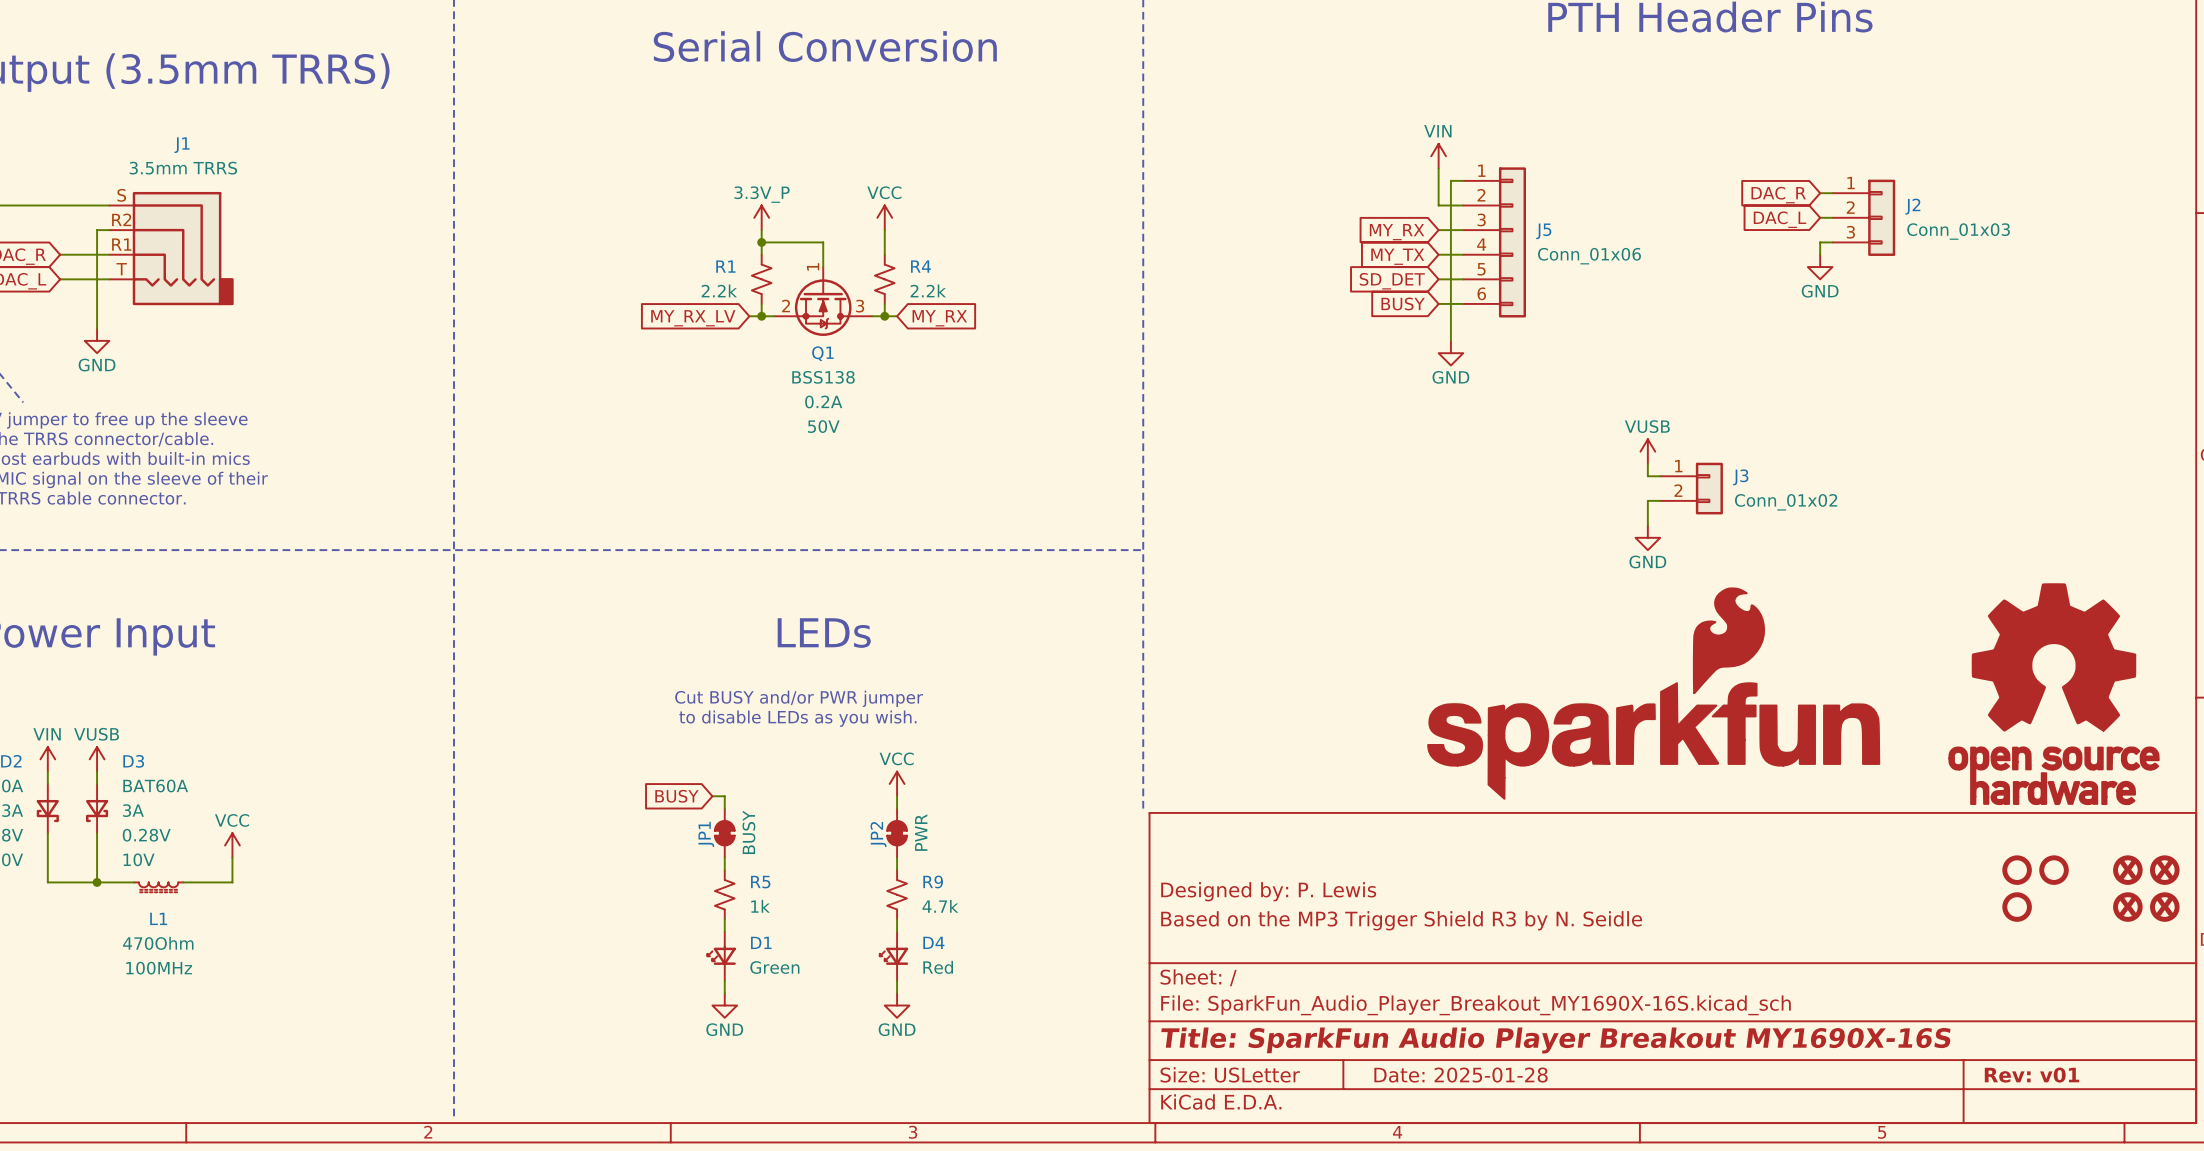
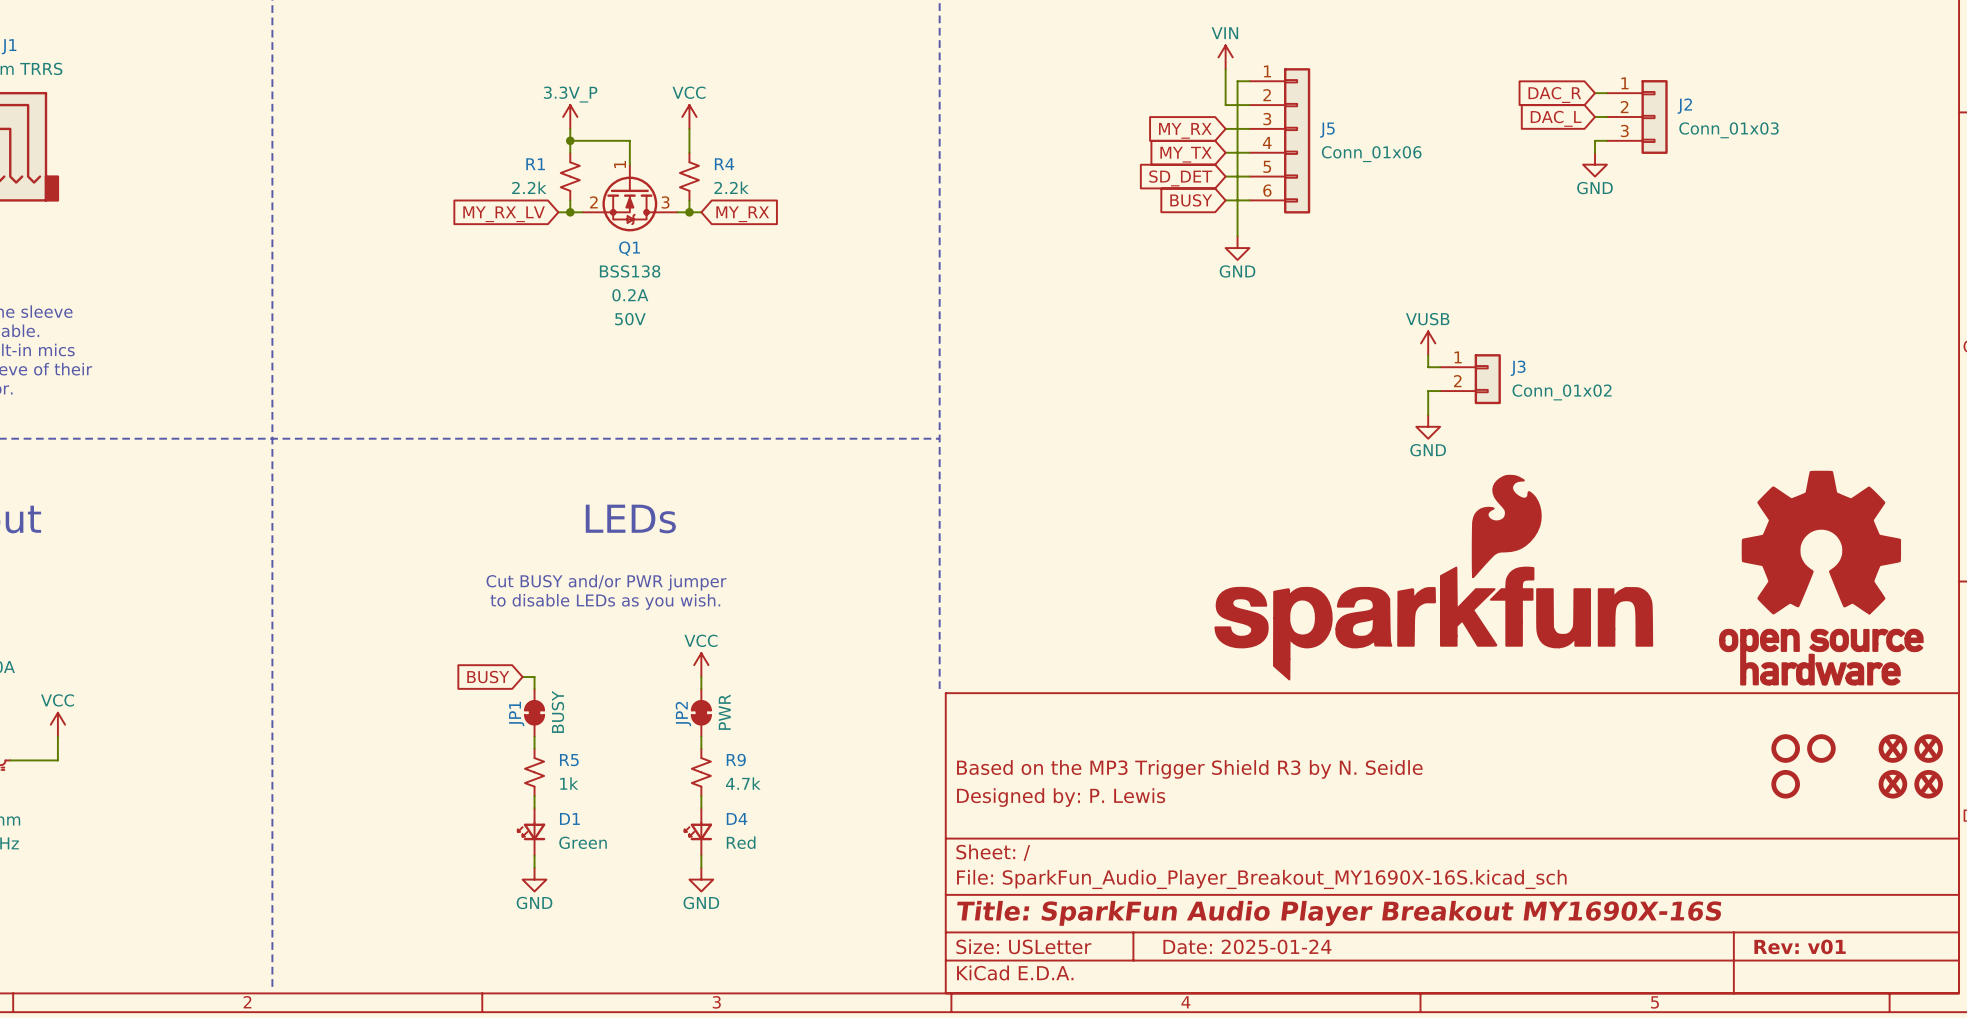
title block: Designed by: P. Lewis (1268, 891) -> Based on the MP3 Trigger Shield R3 by N. Seidle (1189, 769)
title block: Based on the MP3 Trigger Shield R3 by N. Seidle (1401, 920) -> Designed by: P. Lewis (1061, 797)
title block: Date: 2025-01-28 (1461, 1075) -> Date: 2025-01-24 (1247, 946)

